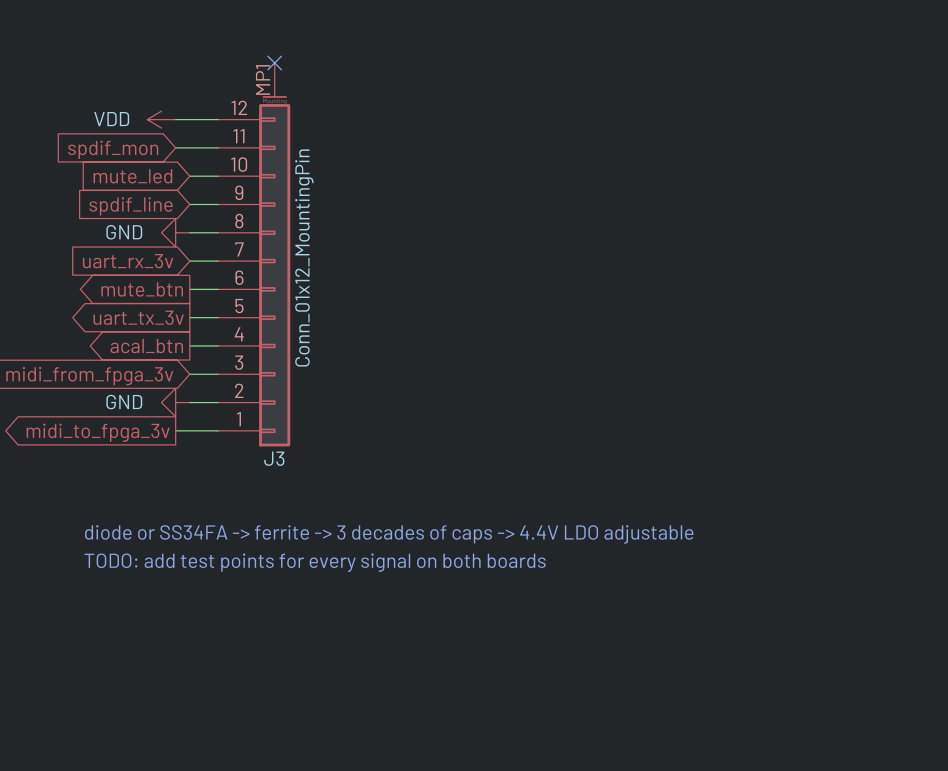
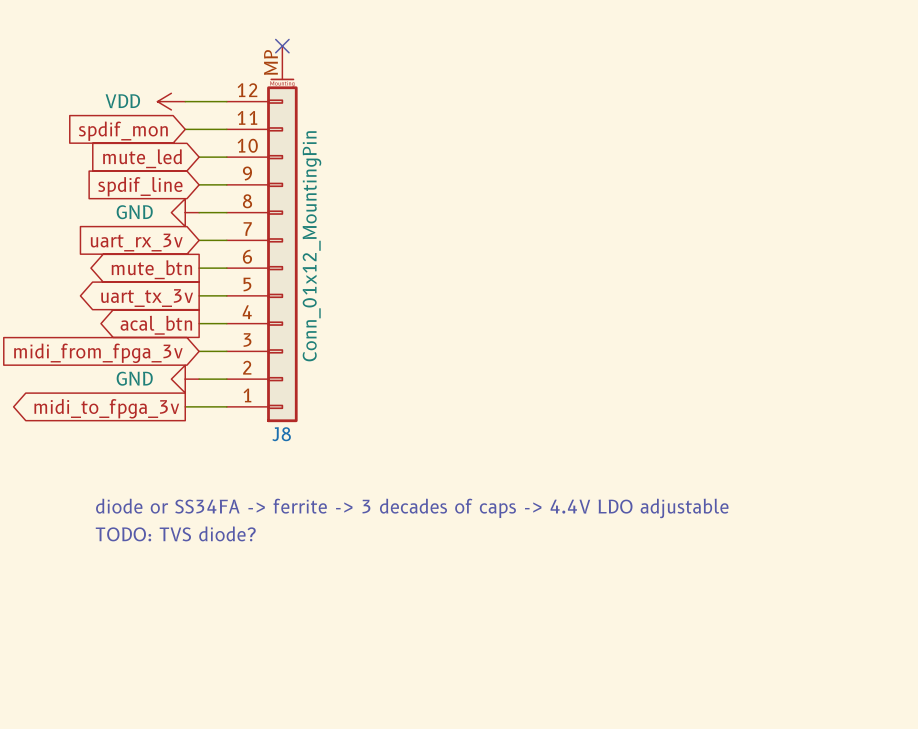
J3 pin number: MP1 (263, 79) -> MP (270, 62)
J3 name: J3 (274, 458) -> J8 (281, 434)
text: TODO: add test points for every signal on both boards (315, 562) -> TODO: TVS diode? (175, 533)

